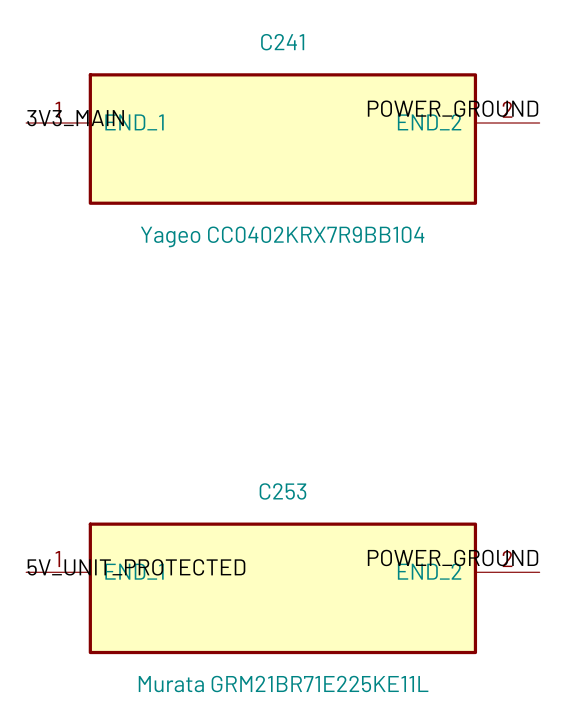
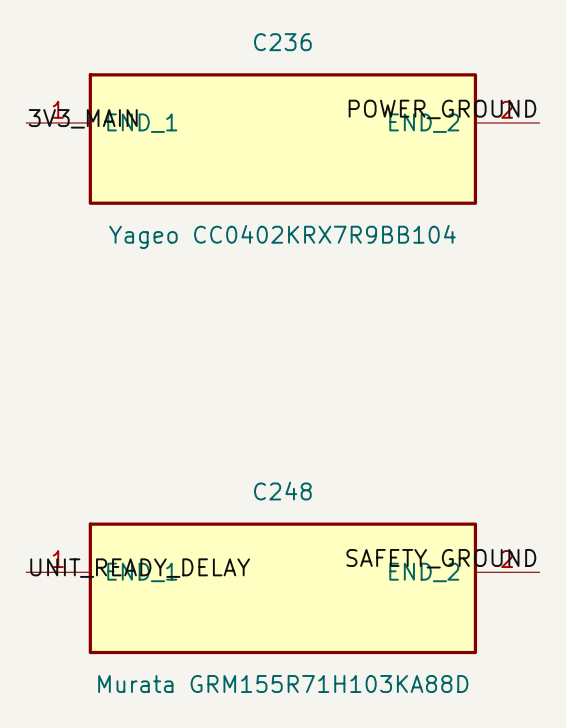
C241 name: C241 (282, 42) -> C236 (282, 42)
C253 name: C253 (282, 491) -> C248 (282, 491)
label: POWER_GROUND (453, 557) -> SAFETY_GROUND (441, 558)
label: 5V_UNIT_PROTECTED (136, 567) -> UNIT_READY_DELAY (140, 568)
C253 value: Murata GRM21BR71E225KE11L (283, 684) -> Murata GRM155R71H103KA88D (283, 684)

